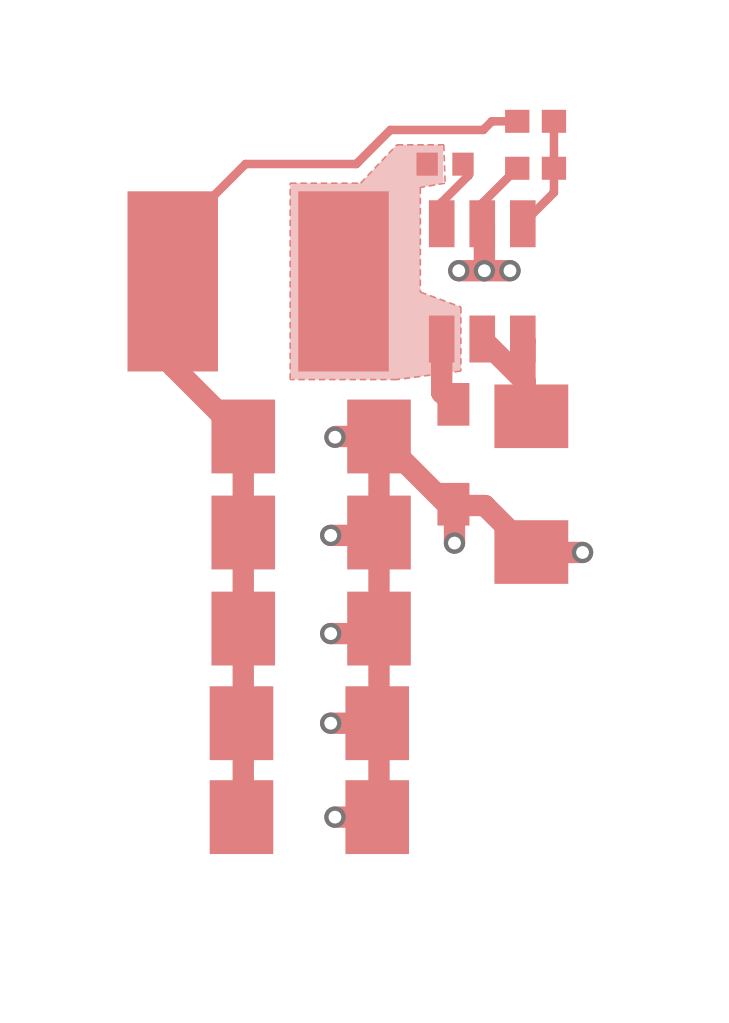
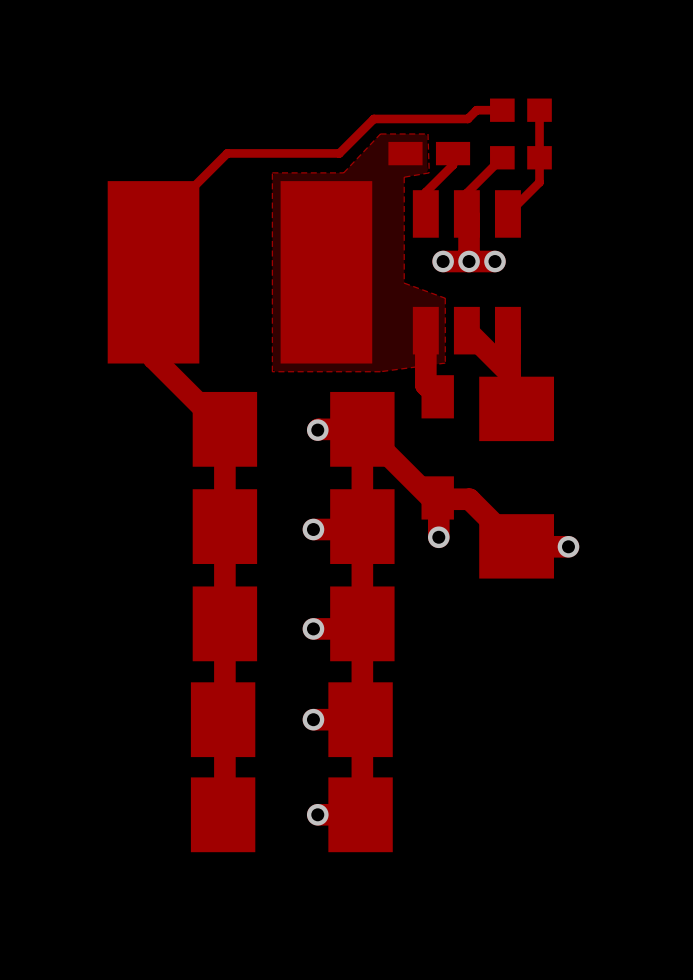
part footprint: [416, 152, 474, 176] -> [388, 141, 471, 166]

